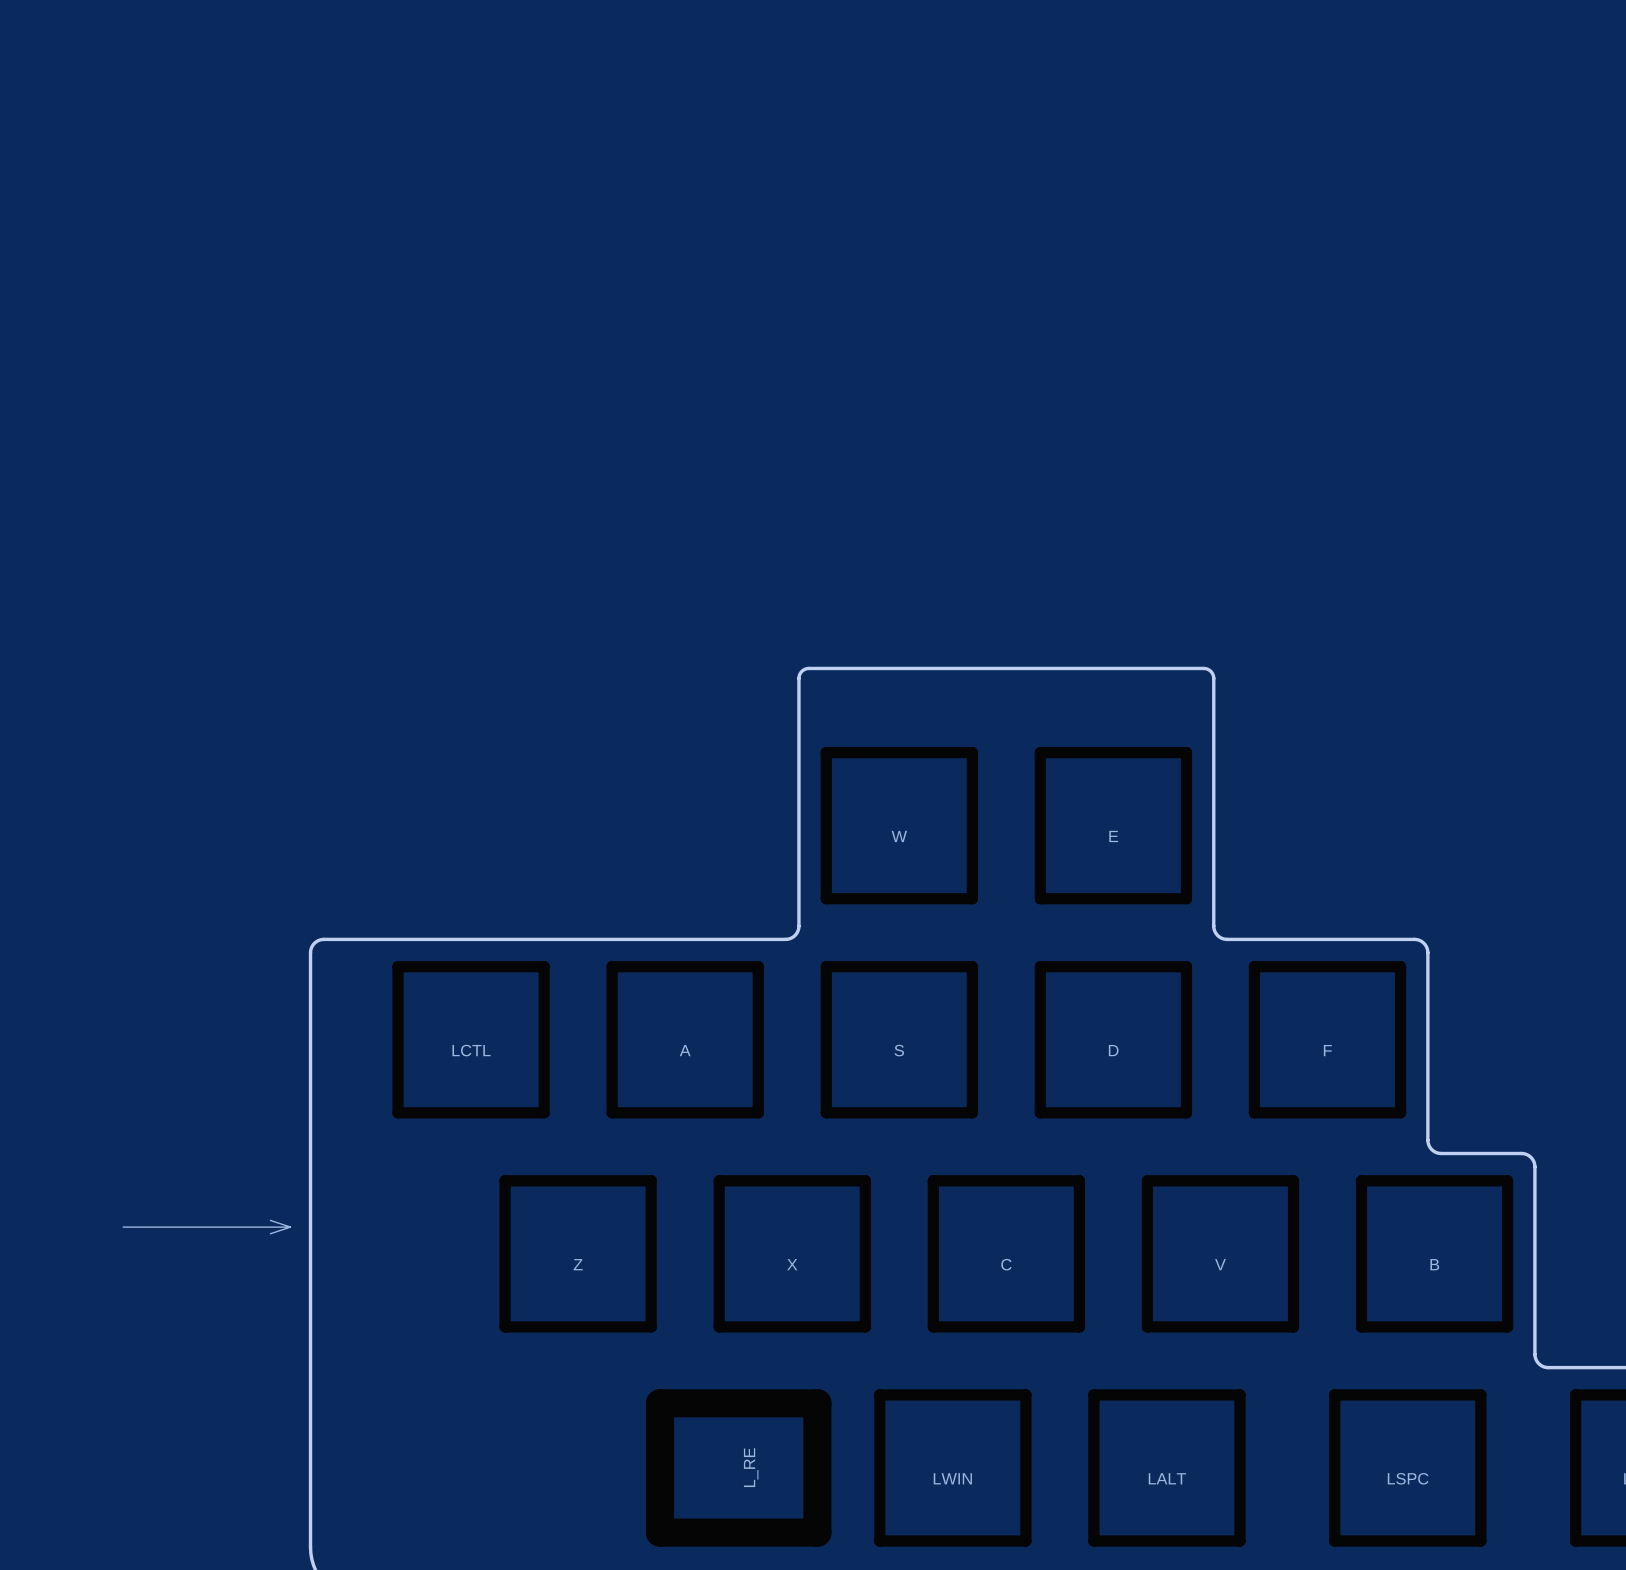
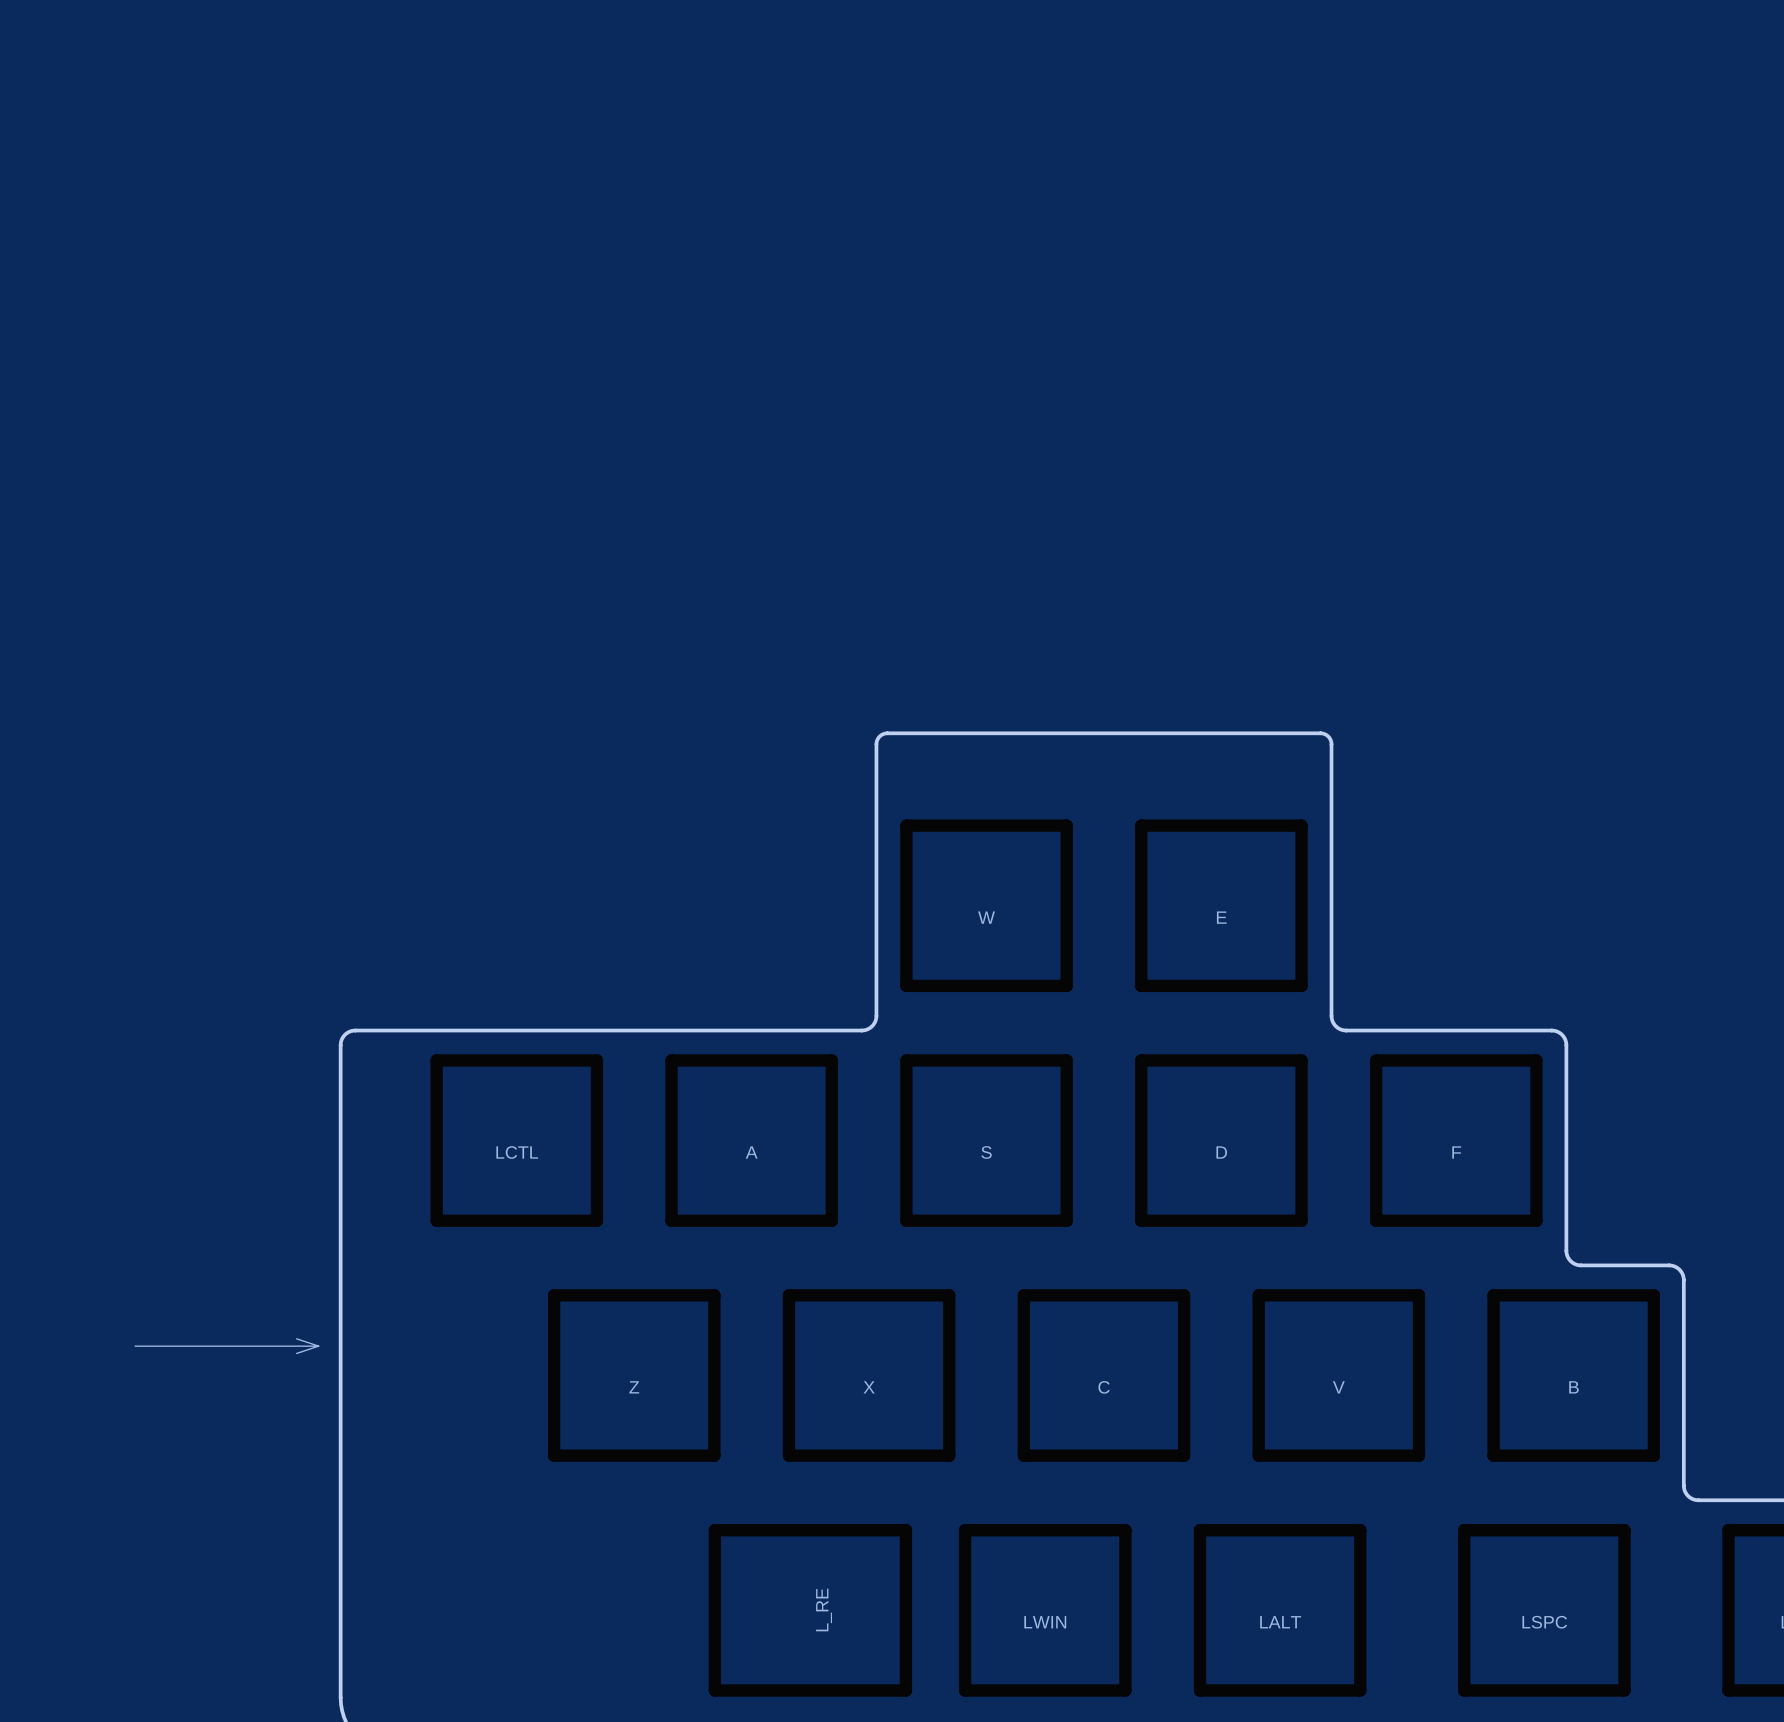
part footprint: [646, 1389, 832, 1547] -> [708, 1524, 913, 1697]

